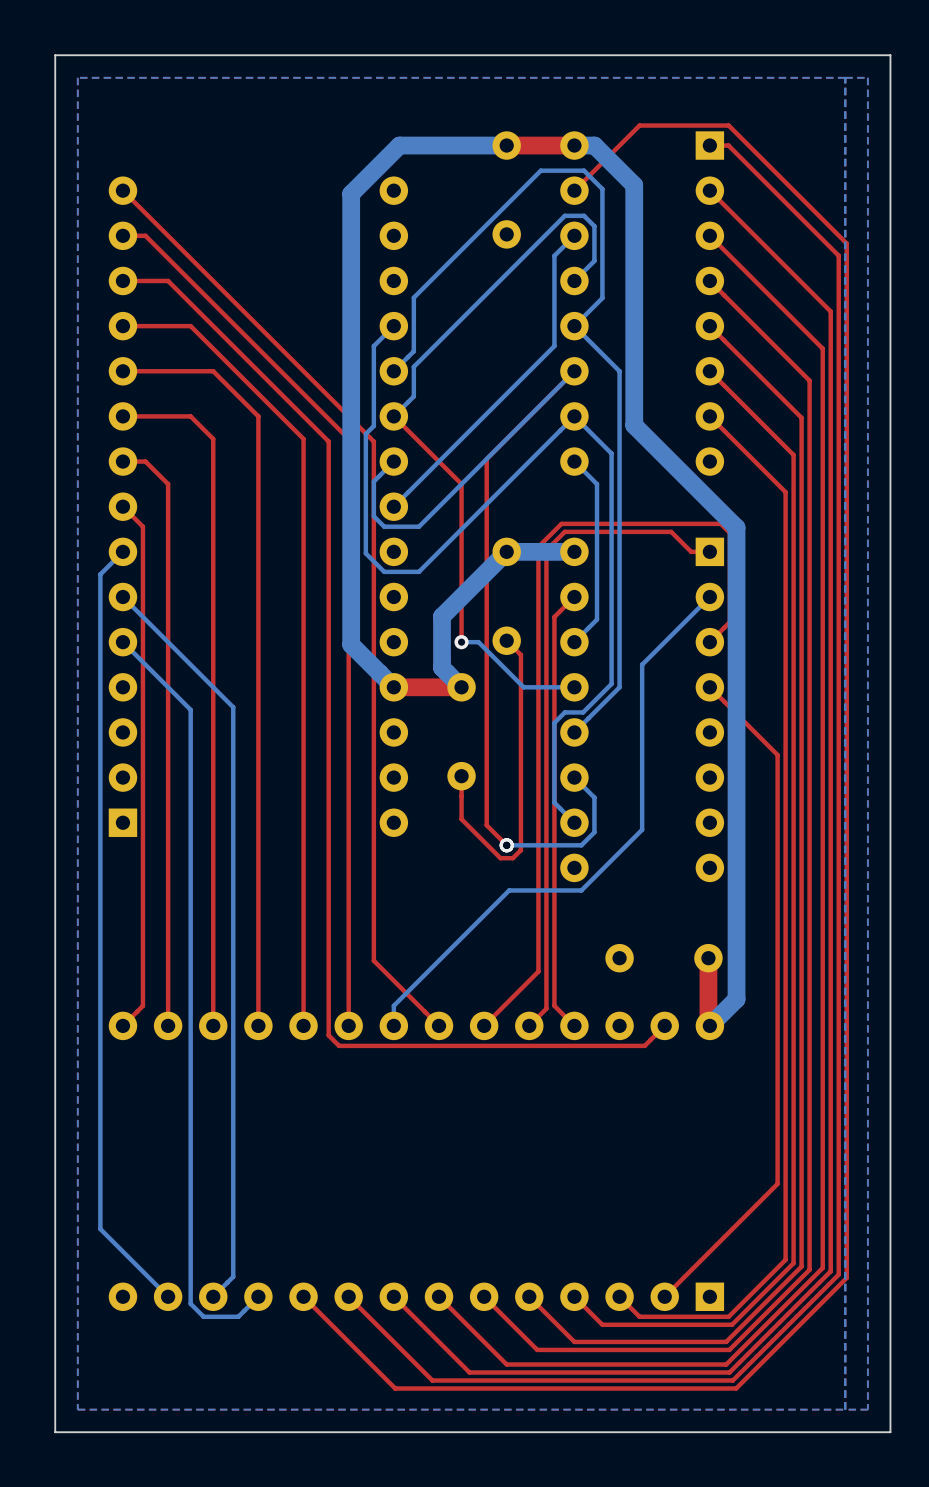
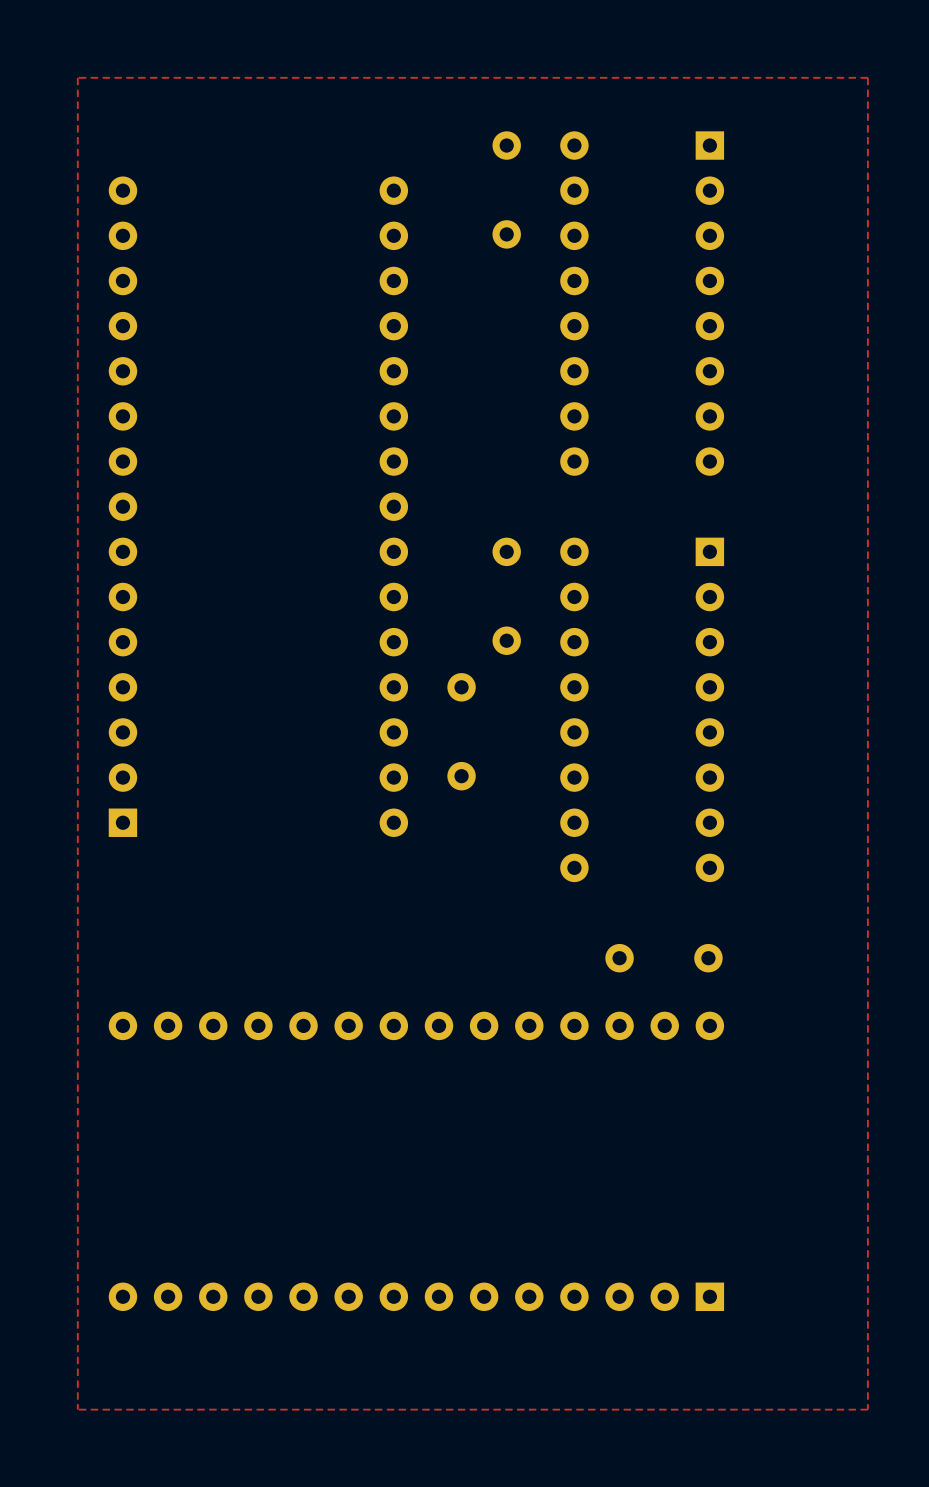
board edge: (890, 55) (890, 1432) (55, 1432) (55, 55) (890, 55) -> none
bottom zone outline: (845, 77) (845, 1409) -> none
bottom zone outline: (867, 77) (77, 77) (77, 1409) (867, 1409) (867, 77) -> none
bottom track: (506, 145) (399, 145) (351, 193) (351, 644) (393, 687) -> none
bottom track: (574, 145) (594, 145) (634, 185) (634, 425) (736, 527) (736, 999) (709, 1025) -> none
top track: (574, 145) (506, 145) -> none
top track: (709, 145) (728, 145) (838, 255) (838, 1274) (732, 1380) (432, 1380) (348, 1296) -> none
top track: (122, 190) (373, 441) (373, 960) (438, 1025) -> none
top track: (574, 190) (639, 125) (728, 125) (846, 243) (846, 1277) (736, 1388) (395, 1388) (303, 1296) -> none
top track: (709, 190) (830, 311) (830, 1271) (729, 1372) (469, 1372) (393, 1296) -> none
top track: (122, 235) (145, 235) (348, 438) (348, 1025) -> none
bottom track: (574, 235) (554, 255) (554, 346) (393, 506) -> none
top track: (709, 235) (822, 348) (822, 1268) (726, 1364) (506, 1364) (438, 1296) -> none
top track: (122, 280) (168, 280) (328, 441) (328, 1035) (339, 1045) (644, 1045) (664, 1025) -> none
bottom track: (574, 280) (594, 260) (594, 226) (584, 215) (564, 215) (413, 366) (413, 396) (393, 416) -> none
top track: (709, 280) (809, 380) (809, 1269) (729, 1349) (537, 1349) (484, 1296) -> none
top track: (122, 326) (190, 326) (303, 438) (303, 1025) -> none
bottom track: (393, 326) (373, 346) (373, 426) (365, 434) (365, 553) (384, 571) (418, 571) (574, 416) (611, 453) (611, 683) (583, 712) (564, 712) (554, 722) (554, 802) (574, 822) -> none
top track: (709, 326) (801, 417) (801, 1266) (726, 1341) (574, 1341) (529, 1296) -> none
top track: (122, 371) (213, 371) (258, 416) (258, 1025) -> none
bottom track: (393, 371) (413, 351) (413, 297) (540, 170) (584, 170) (602, 189) (602, 298) (574, 326) (619, 371) (619, 687) (574, 732) -> none
bottom track: (574, 371) (418, 526) (384, 526) (373, 516) (373, 481) (393, 461) -> none
top track: (574, 371) (486, 458) (486, 825) (506, 845) -> none
top track: (709, 371) (793, 454) (793, 1263) (732, 1324) (602, 1324) (574, 1296) -> none
top track: (122, 416) (190, 416) (213, 438) (213, 1025) -> none
top track: (393, 416) (461, 484) (461, 642) -> none
top track: (709, 416) (785, 492) (785, 1259) (728, 1316) (639, 1316) (619, 1296) -> none
top track: (122, 461) (145, 461) (168, 484) (168, 1025) -> none
bottom track: (574, 461) (597, 484) (597, 619) (574, 642) -> none
top track: (122, 506) (142, 526) (142, 1005) (122, 1025) -> none
bottom track: (122, 551) (100, 574) (100, 1229) (168, 1296) -> none
bottom track: (574, 551) (506, 551) (442, 616) (442, 667) (461, 687) -> none
top track: (709, 551) (691, 551) (671, 531) (564, 531) (546, 550) (546, 1008) (529, 1025) -> none
bottom track: (122, 597) (233, 707) (233, 1276) (213, 1296) -> none
top track: (574, 597) (554, 617) (554, 1005) (574, 1025) -> none
bottom track: (709, 597) (642, 664) (642, 829) (581, 890) (509, 890) (393, 1005) (393, 1025) -> none
top track: (506, 640) (520, 654) (520, 850) (512, 858) (500, 858) (461, 819) (461, 776) -> none
bottom track: (122, 642) (190, 709) (190, 1303) (203, 1316) (238, 1316) (258, 1296) -> none
bottom track: (461, 642) (478, 642) (523, 687) (574, 687) -> none
via: (461, 642) -> none
top track: (709, 642) (729, 622) (729, 533) (720, 523) (561, 523) (538, 546) (538, 971) (484, 1025) -> none
top track: (461, 687) (393, 687) -> none
top track: (709, 687) (777, 755) (777, 1183) (664, 1296) -> none
bottom track: (574, 777) (594, 797) (594, 832) (581, 845) (506, 845) -> none
via: (506, 845) -> none
top track: (708, 958) (709, 1025) -> none

